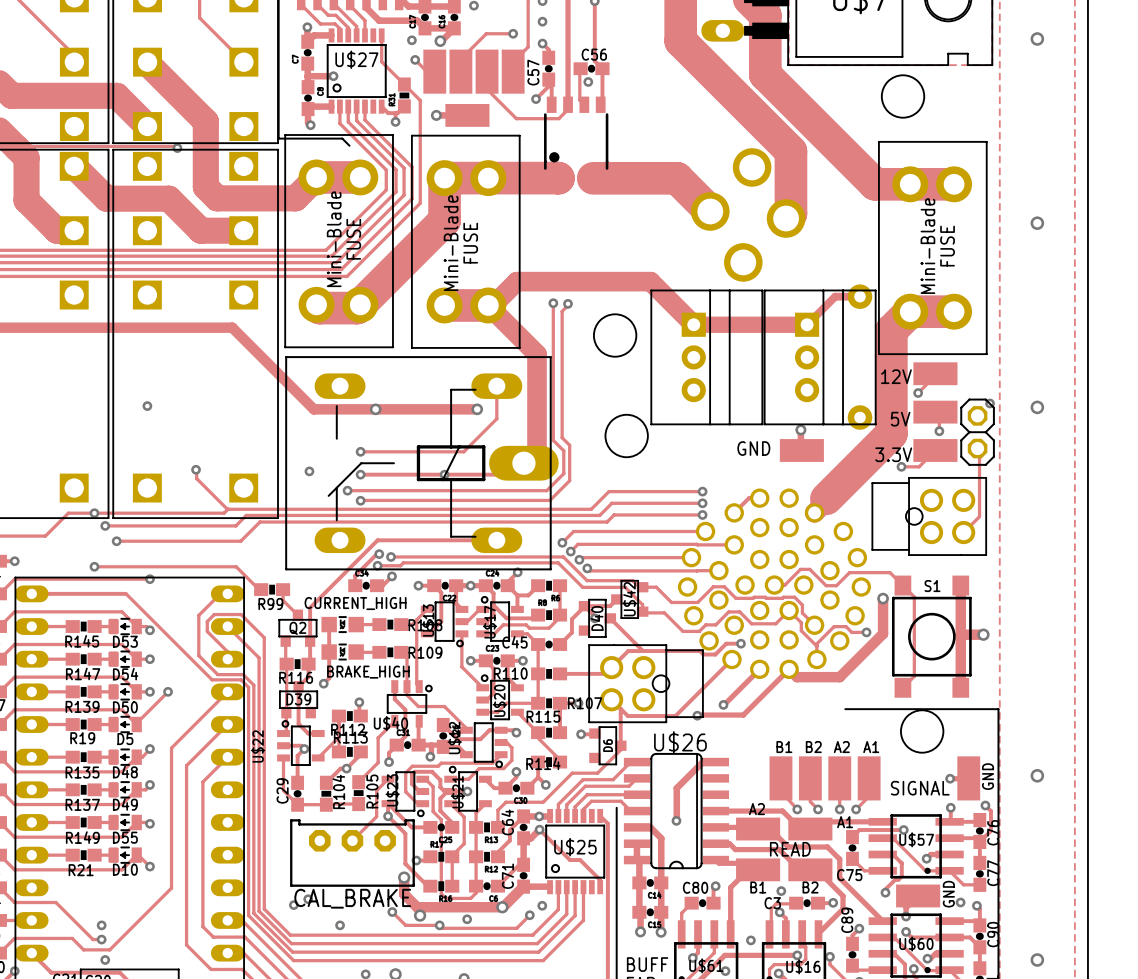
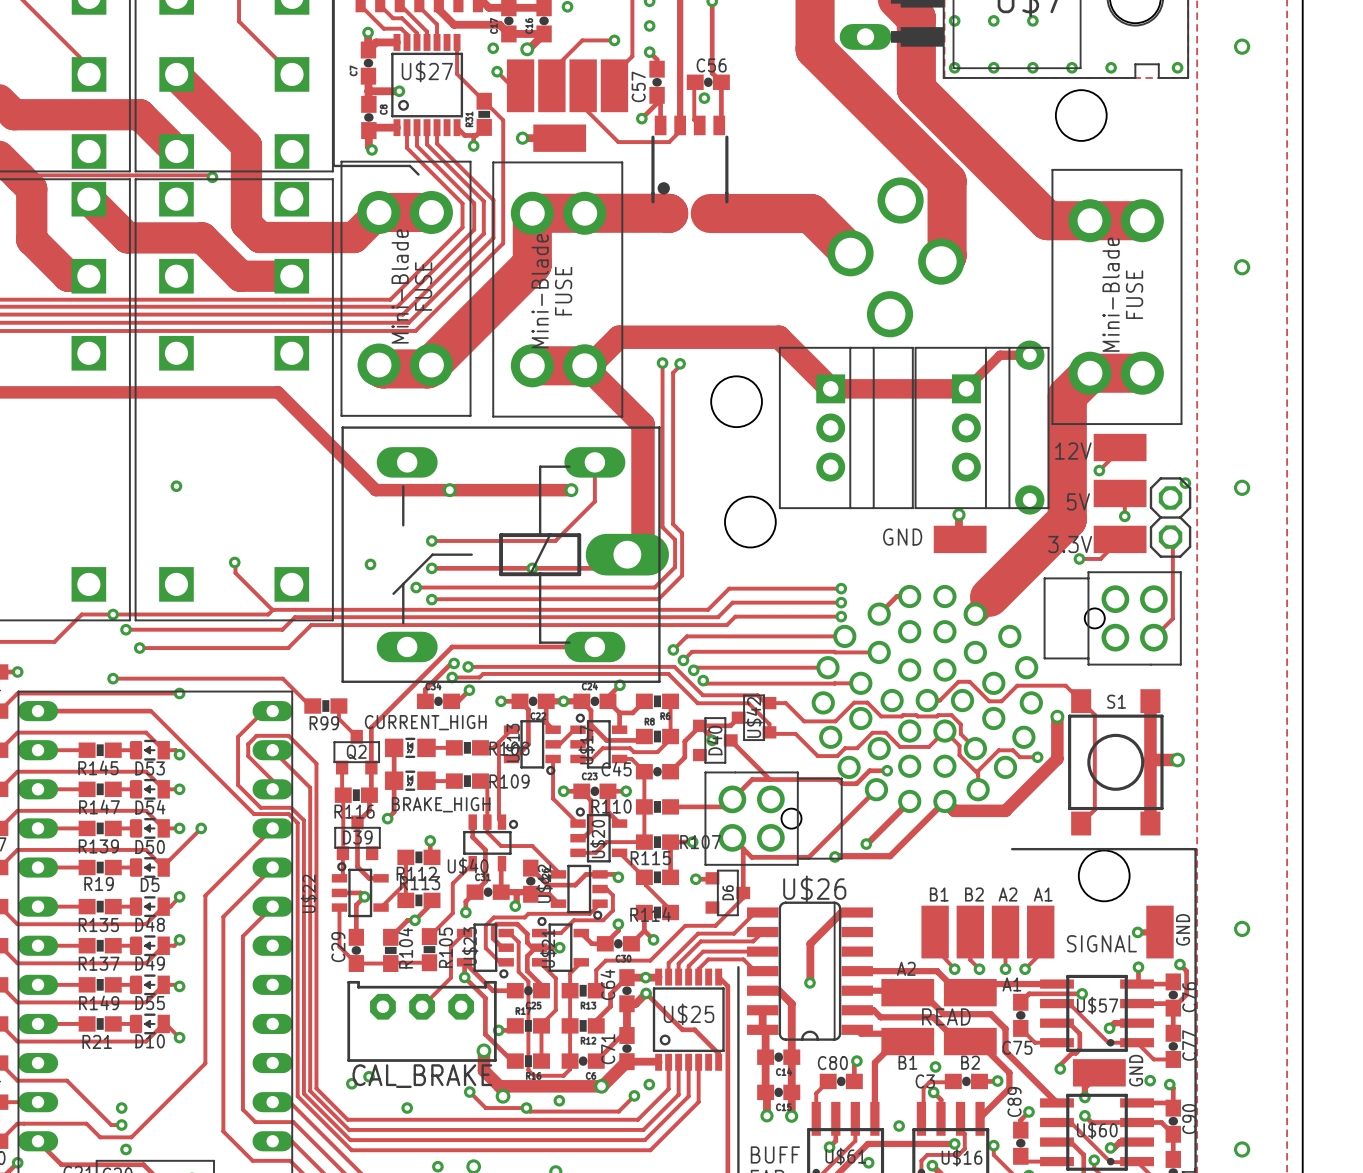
via: none -> (954, 20)
via: none -> (993, 20)
via: none -> (1032, 20)
via: none -> (954, 67)
via: none -> (993, 67)
via: none -> (1032, 67)
via: none -> (1072, 67)
via: none -> (1111, 67)
via: none -> (1177, 67)

